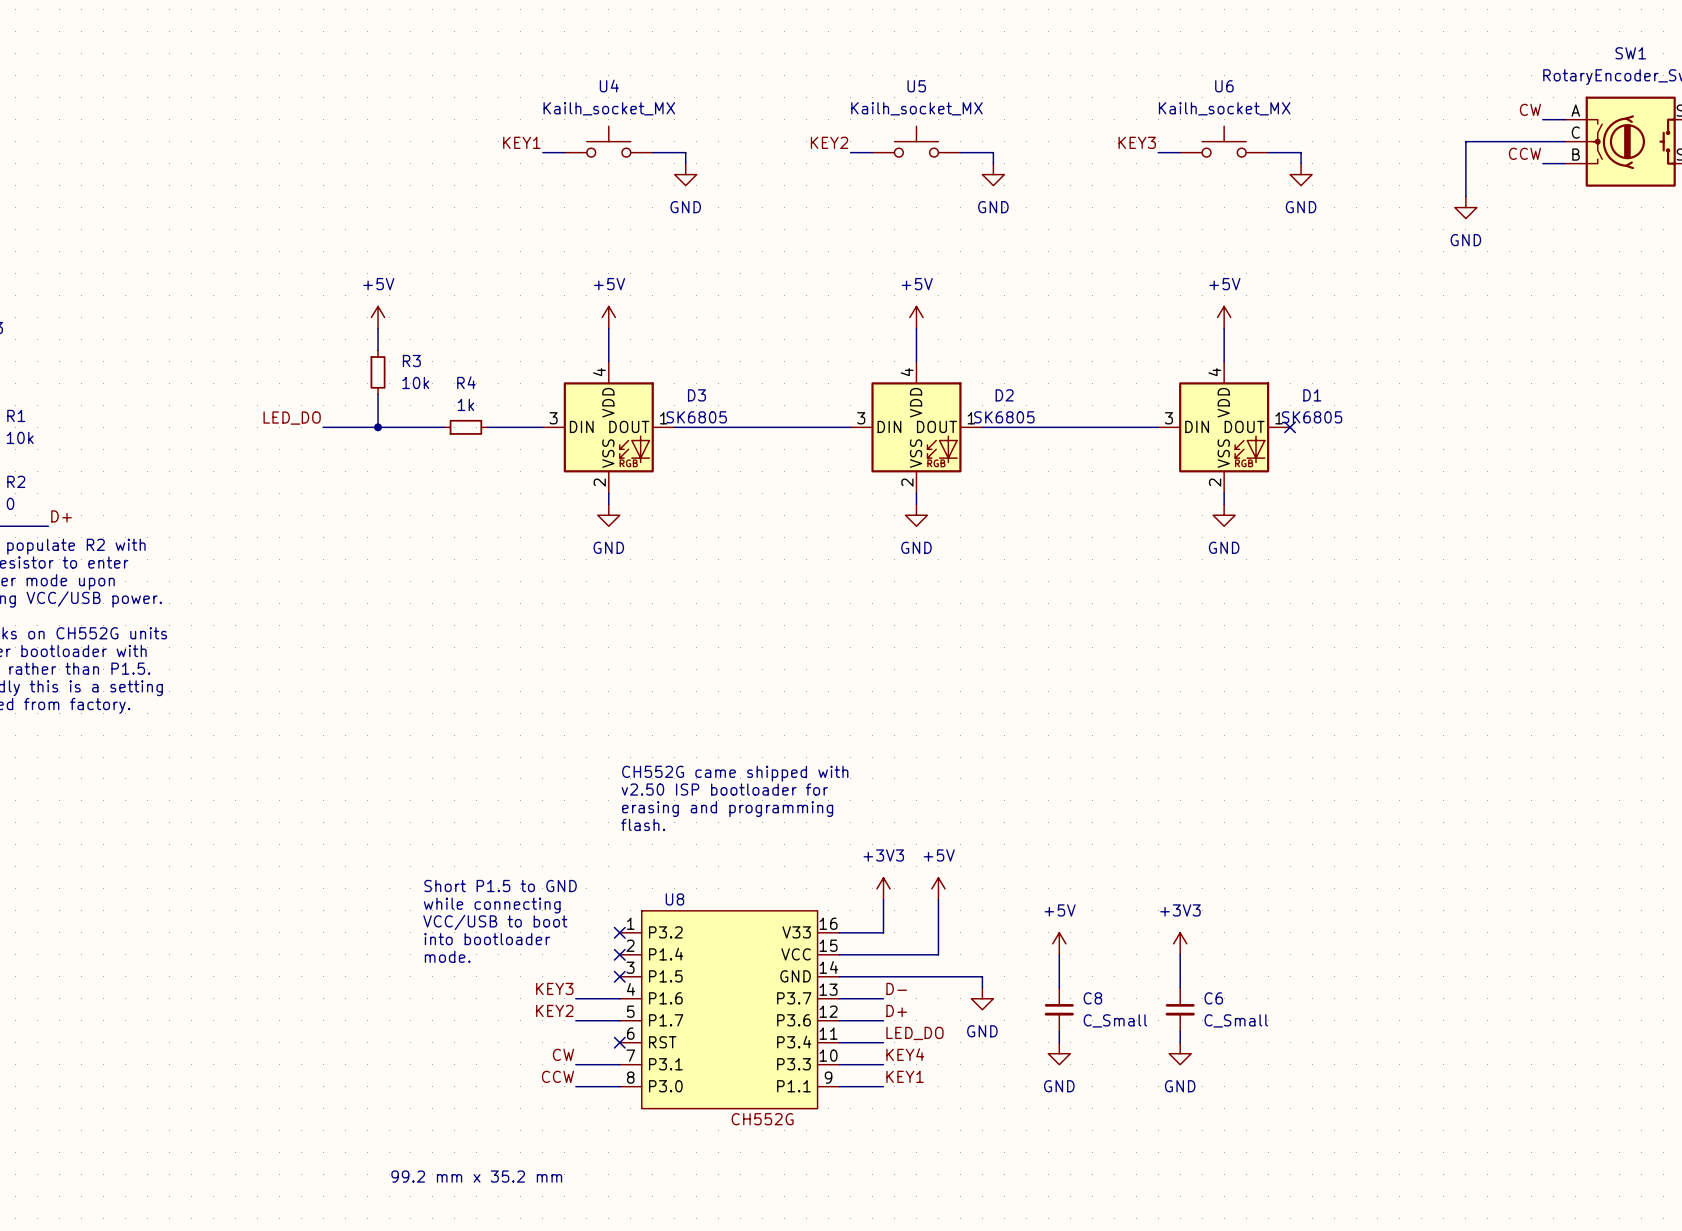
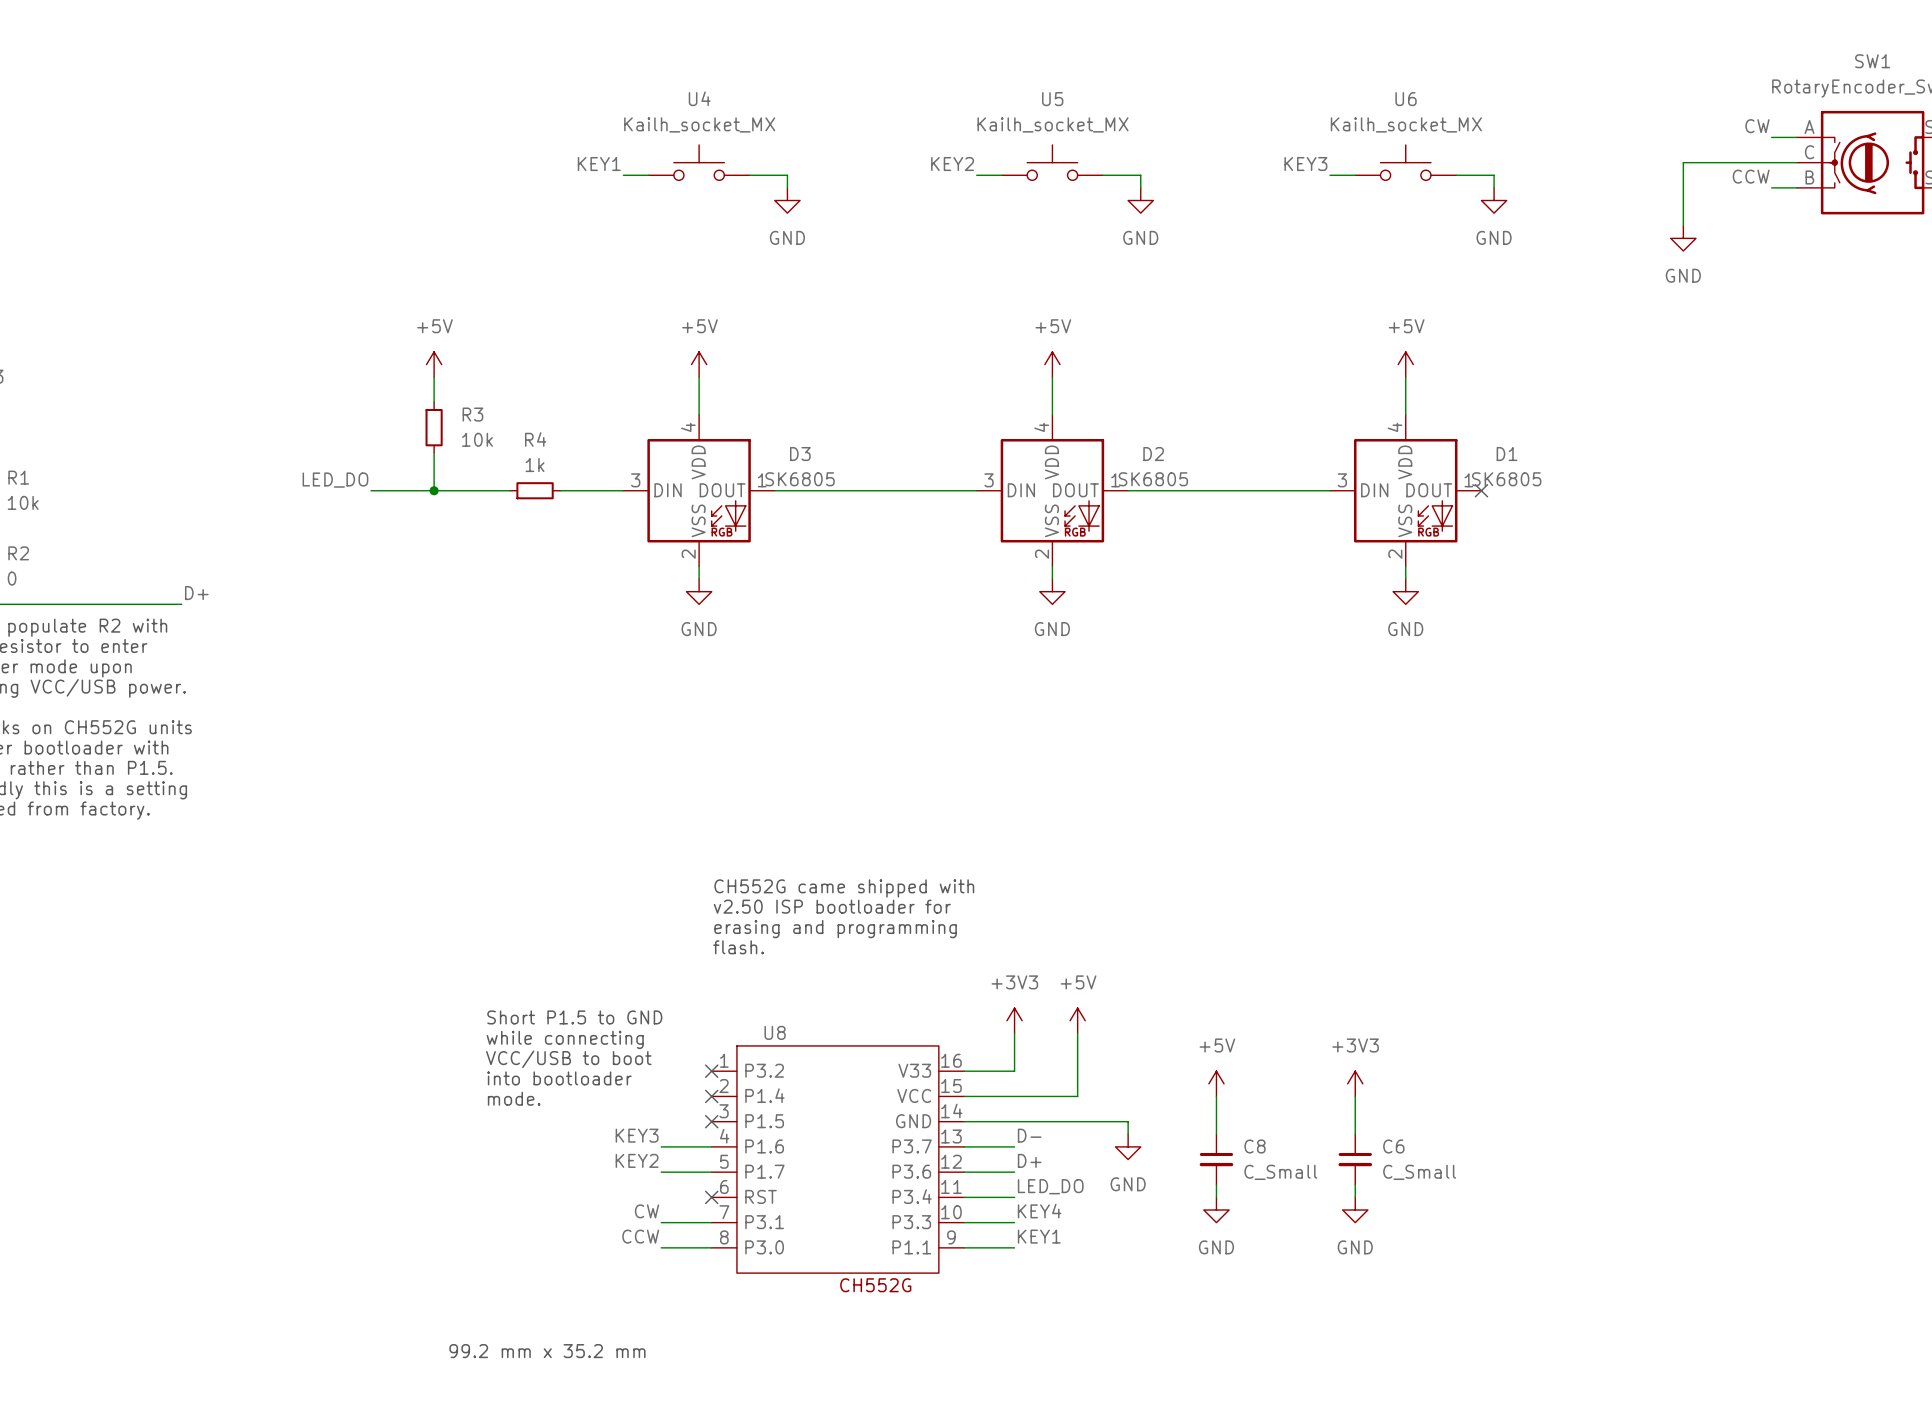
label position: D+ (61, 516) -> D+ (196, 593)
wire: none -> (55, 604) (181, 604)

